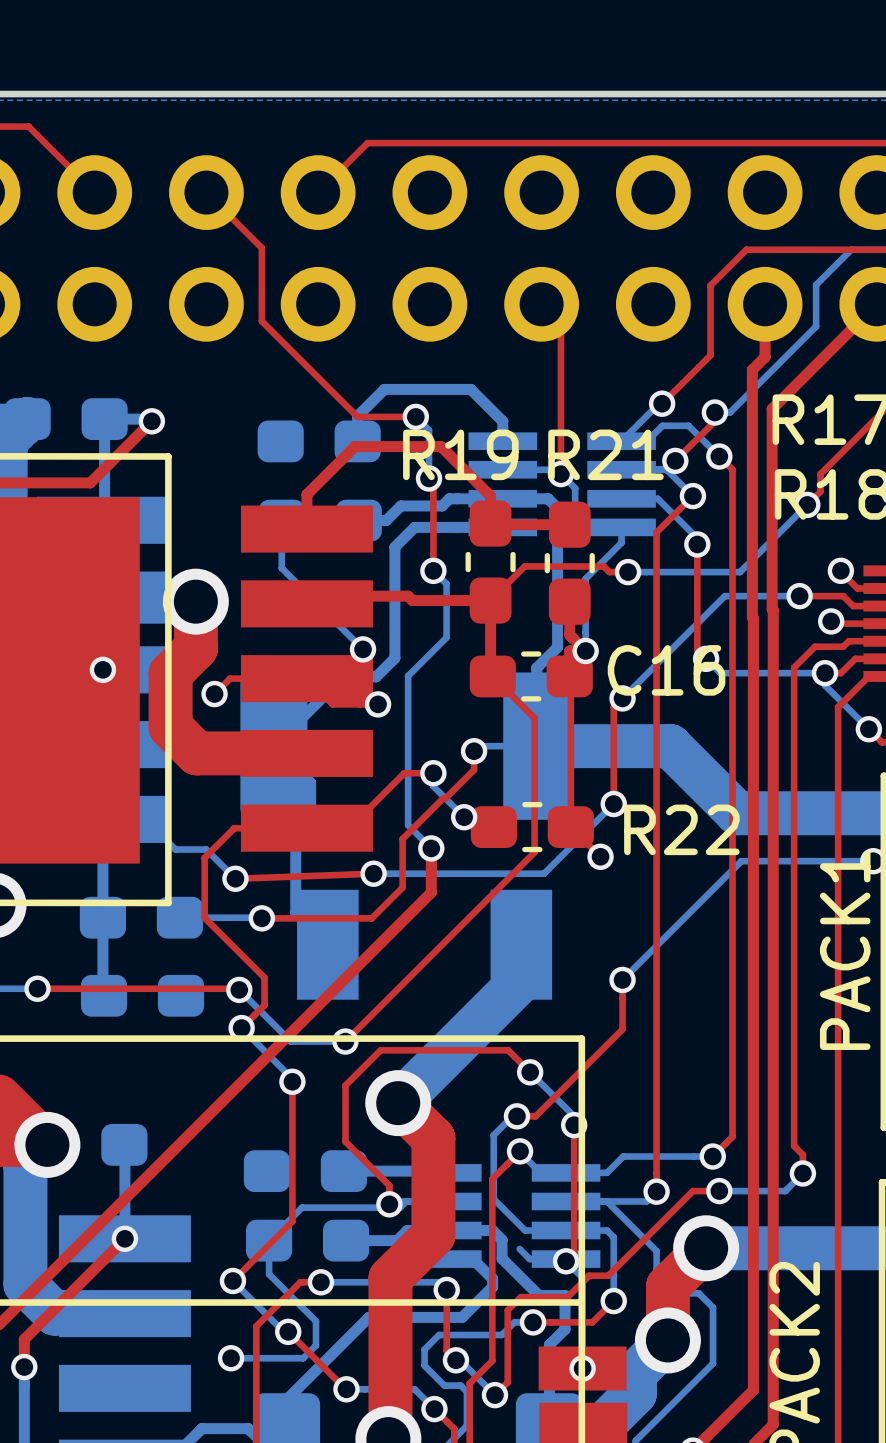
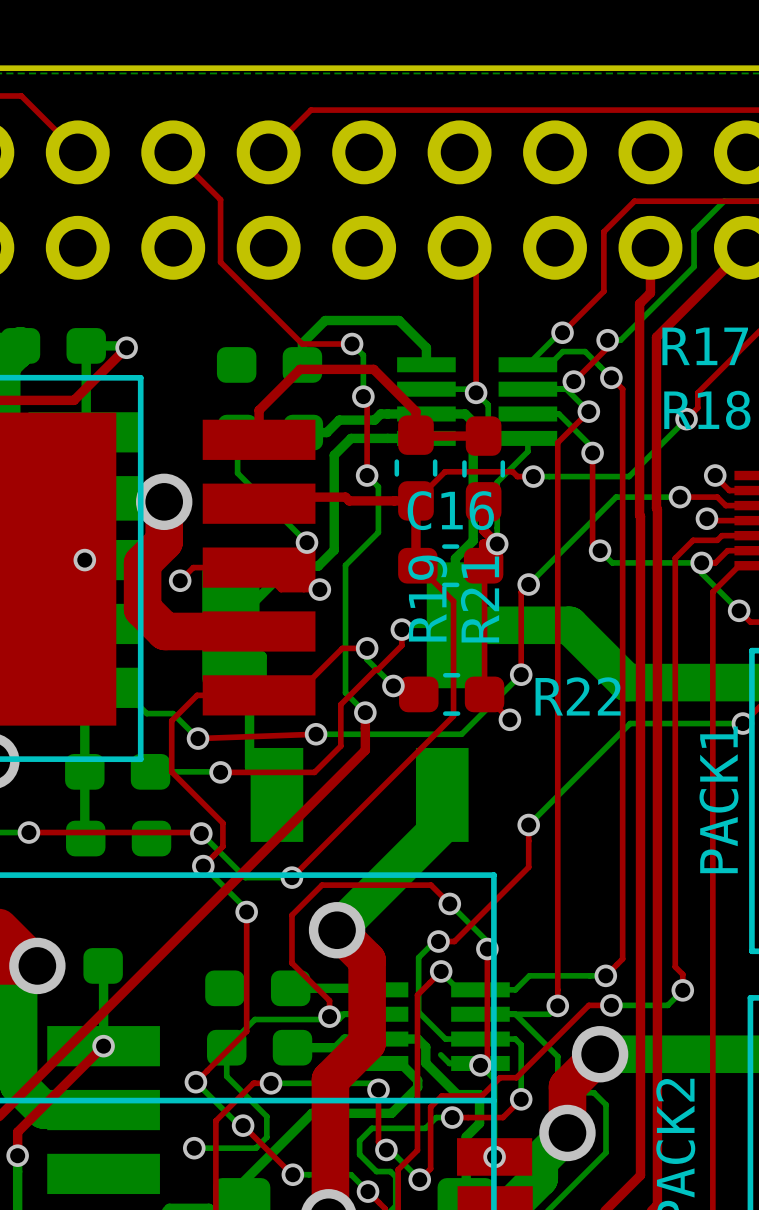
R19 name rotation: 0° (460, 454) -> 90° counterclockwise (427, 598)
R19 name position: R19 (460, 454) -> R19 (427, 598)
R21 name rotation: 0° (606, 454) -> 90° counterclockwise (480, 599)
R21 name position: R21 (606, 454) -> R21 (480, 599)
C16 name position: C16 (666, 670) -> C16 (450, 510)

